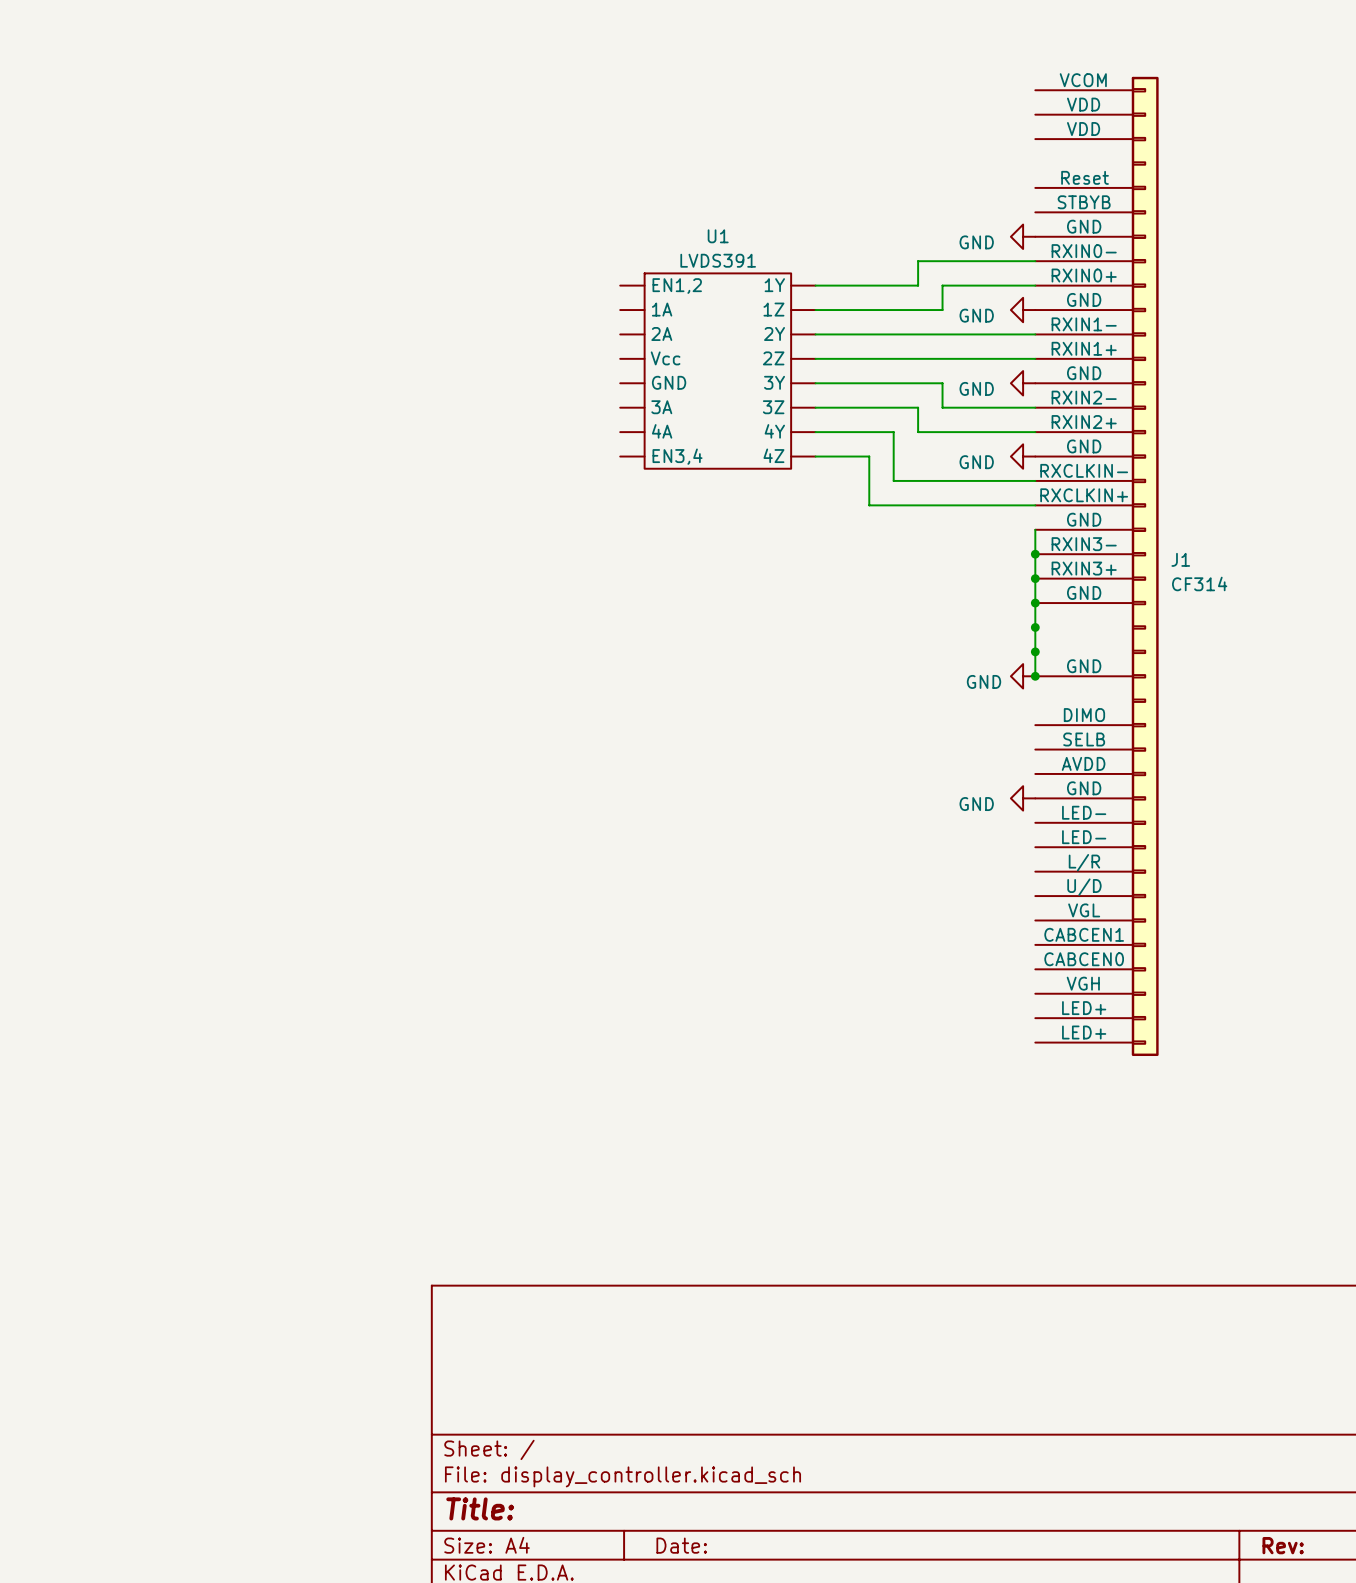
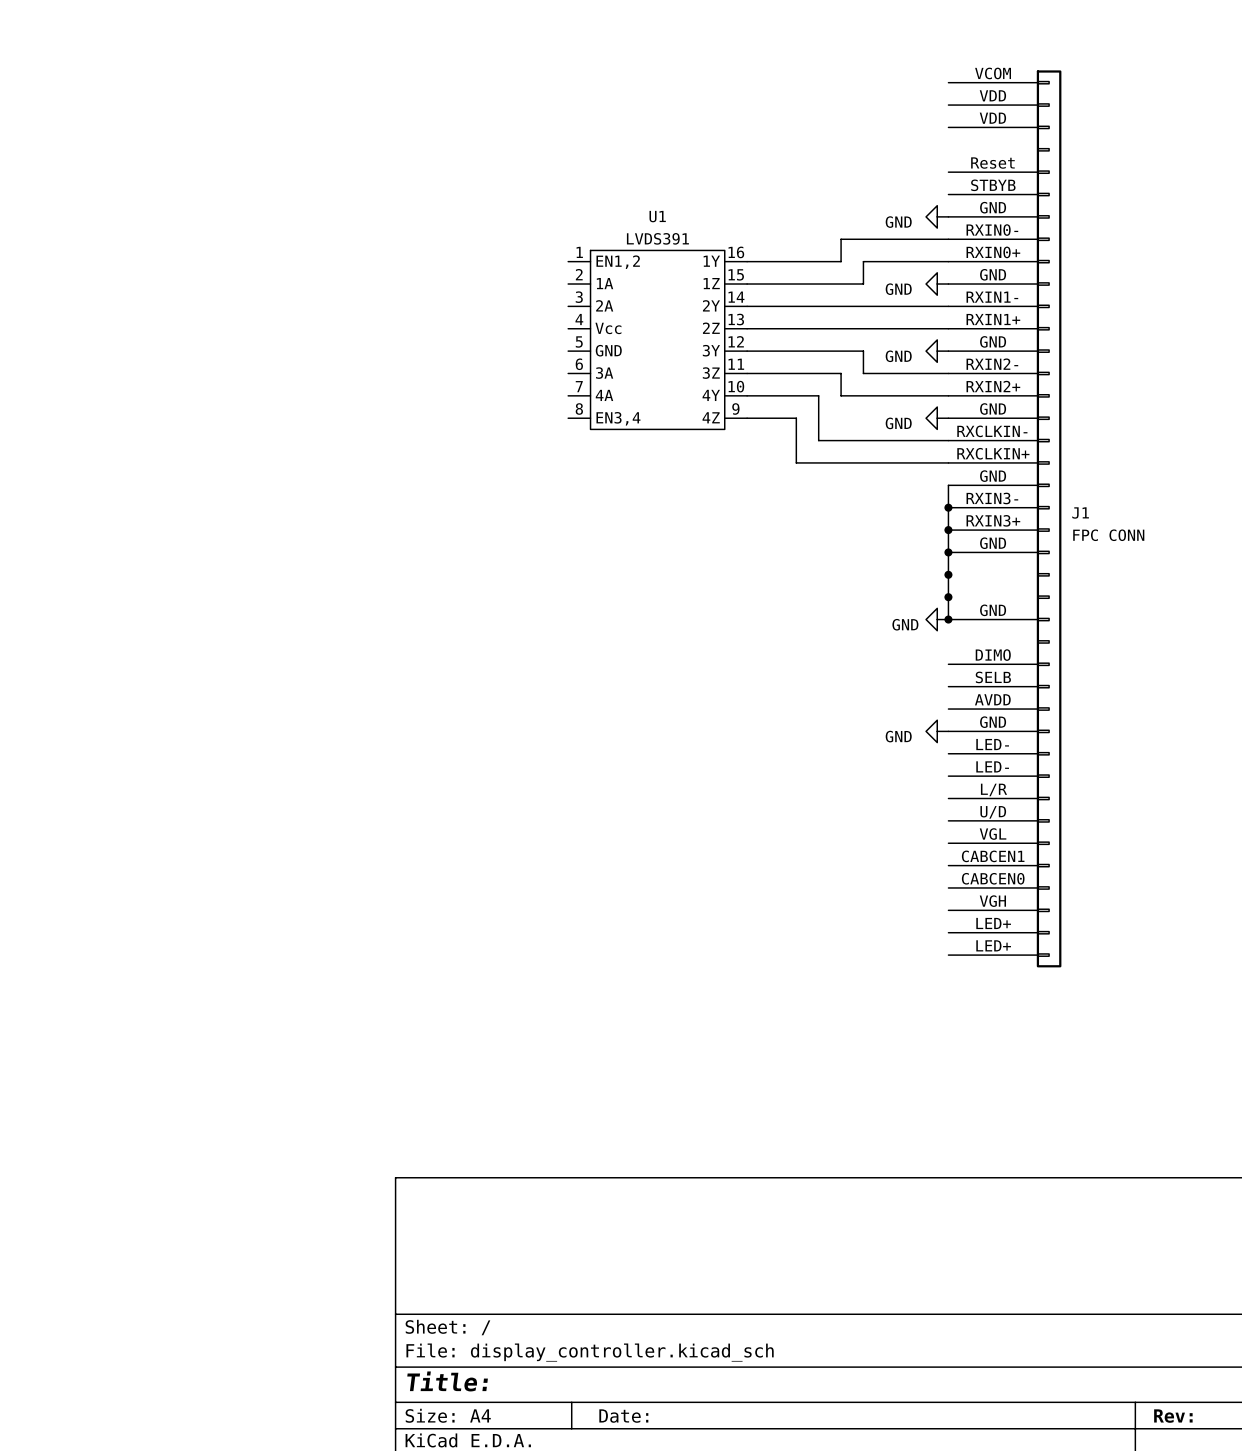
U1 symbol: [620, 273, 816, 469] -> [568, 250, 748, 430]
J1 value: CF314 (1199, 583) -> FPC CONN (1108, 535)

